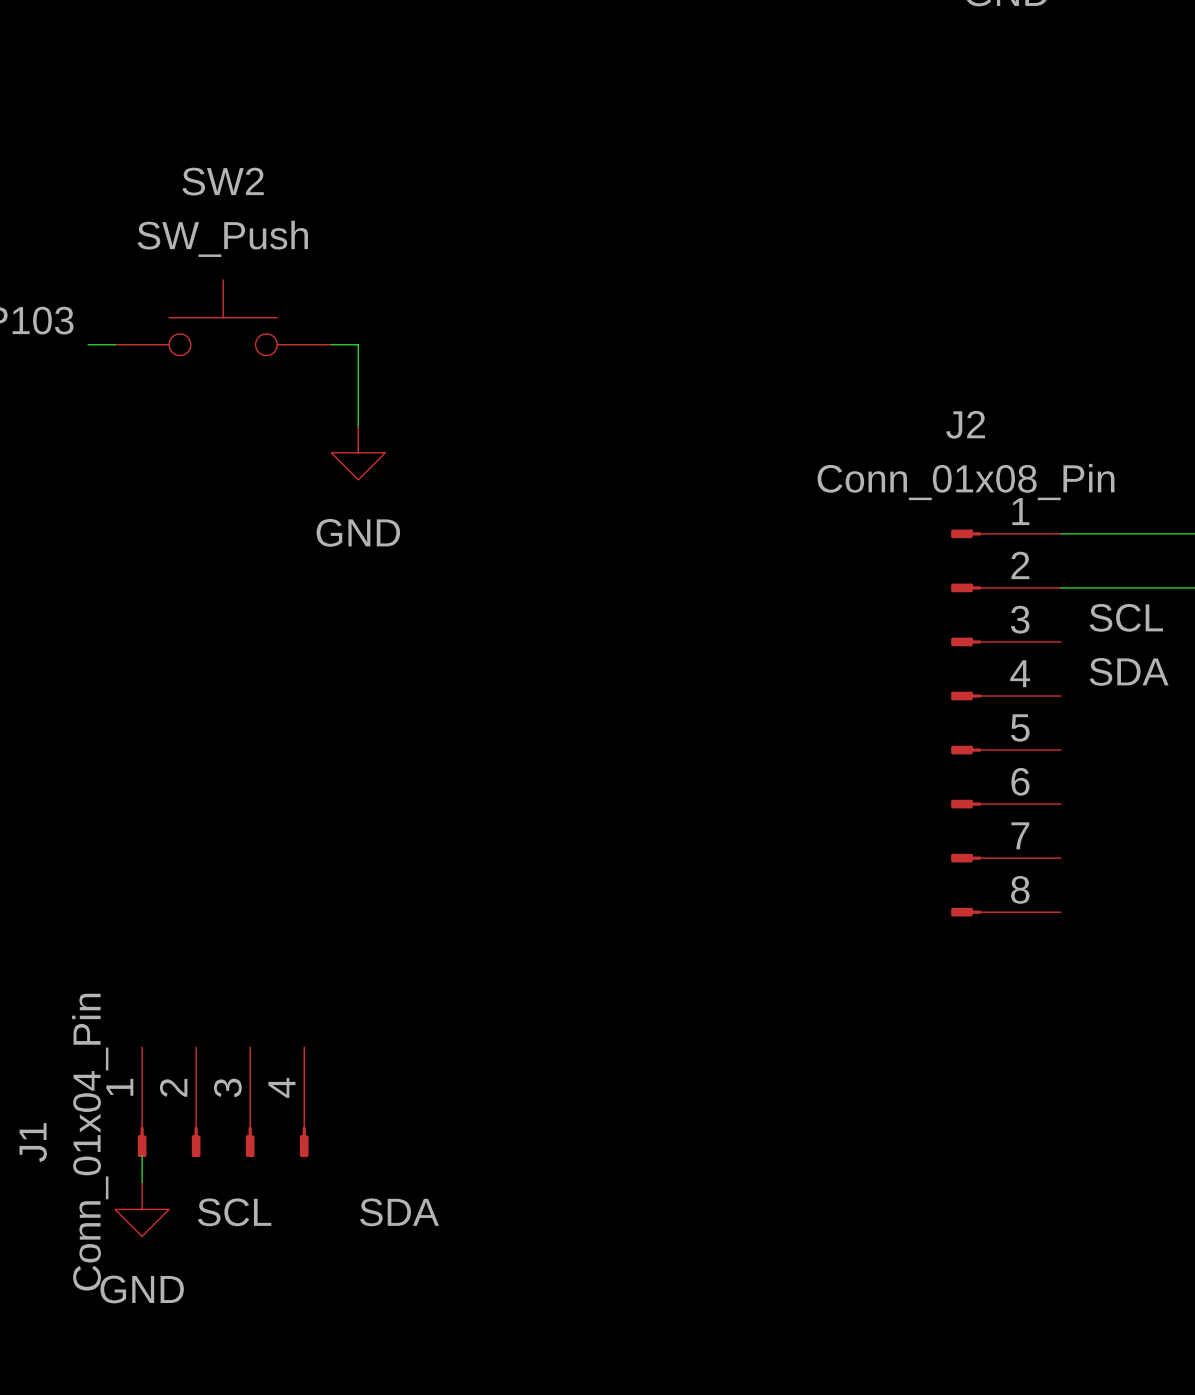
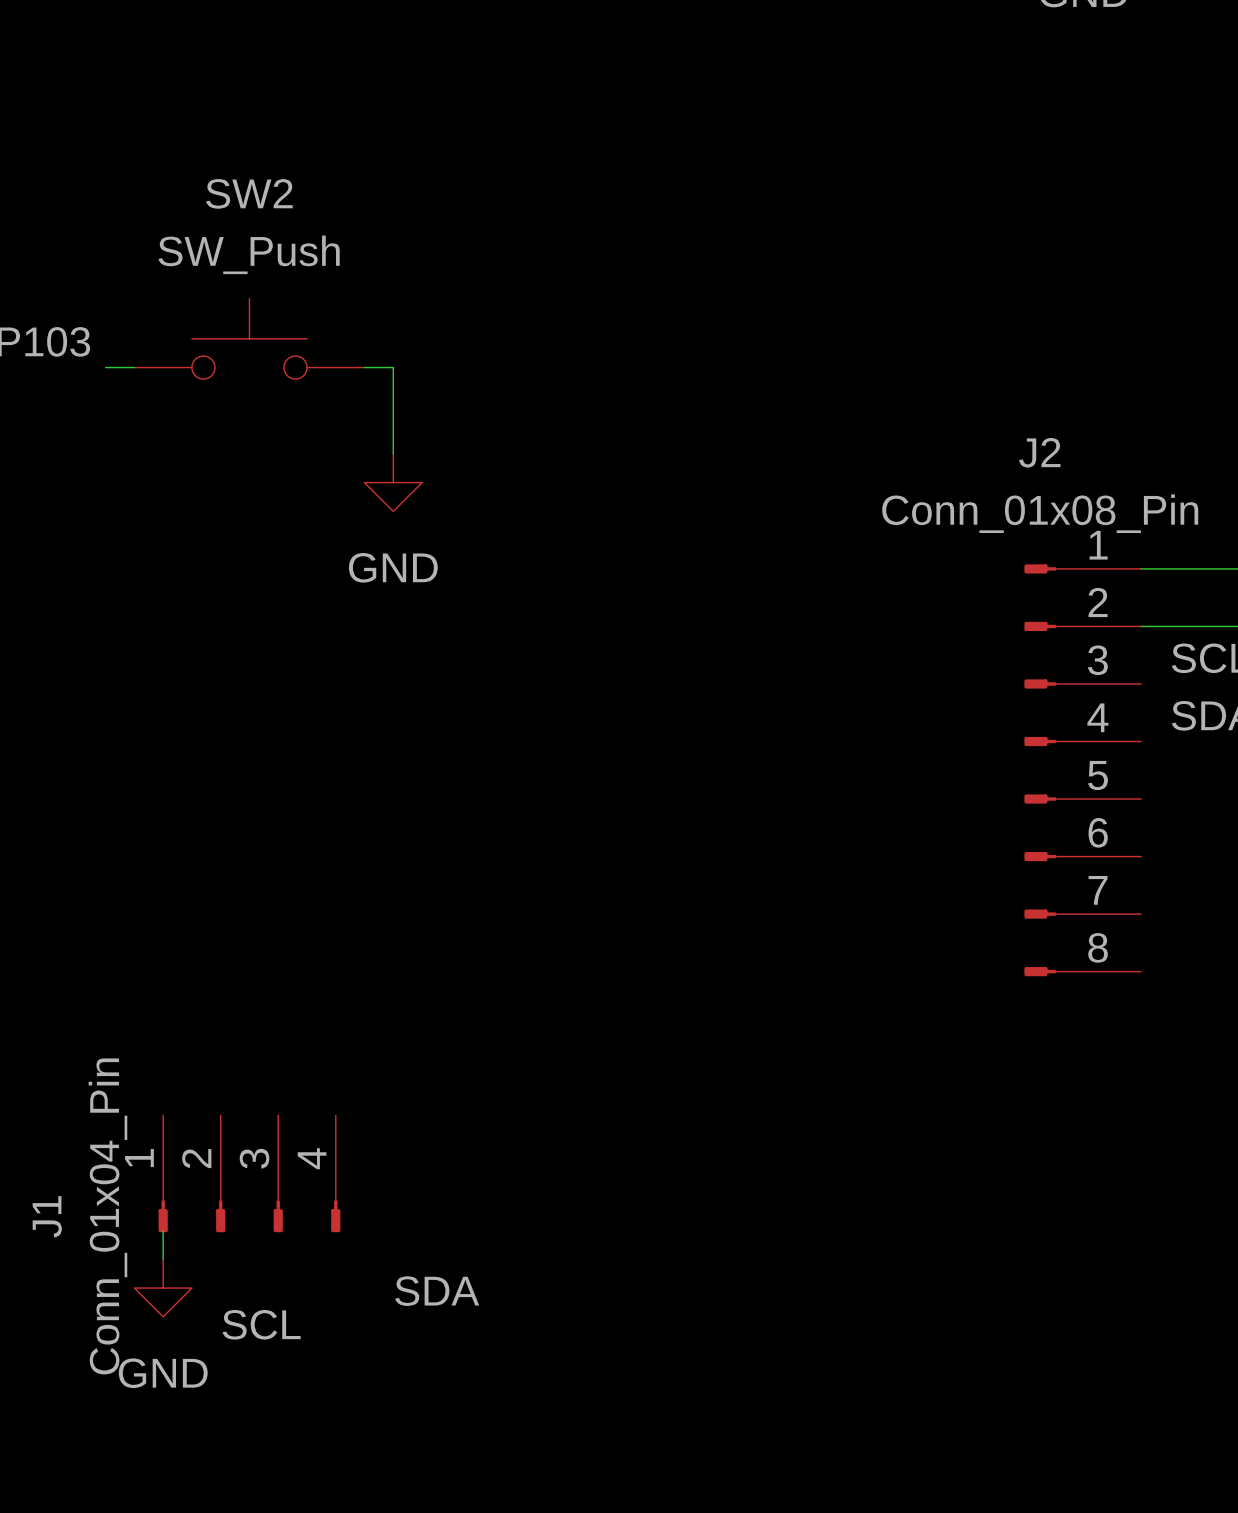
label position: SCL (234, 1212) -> SCL (261, 1324)

